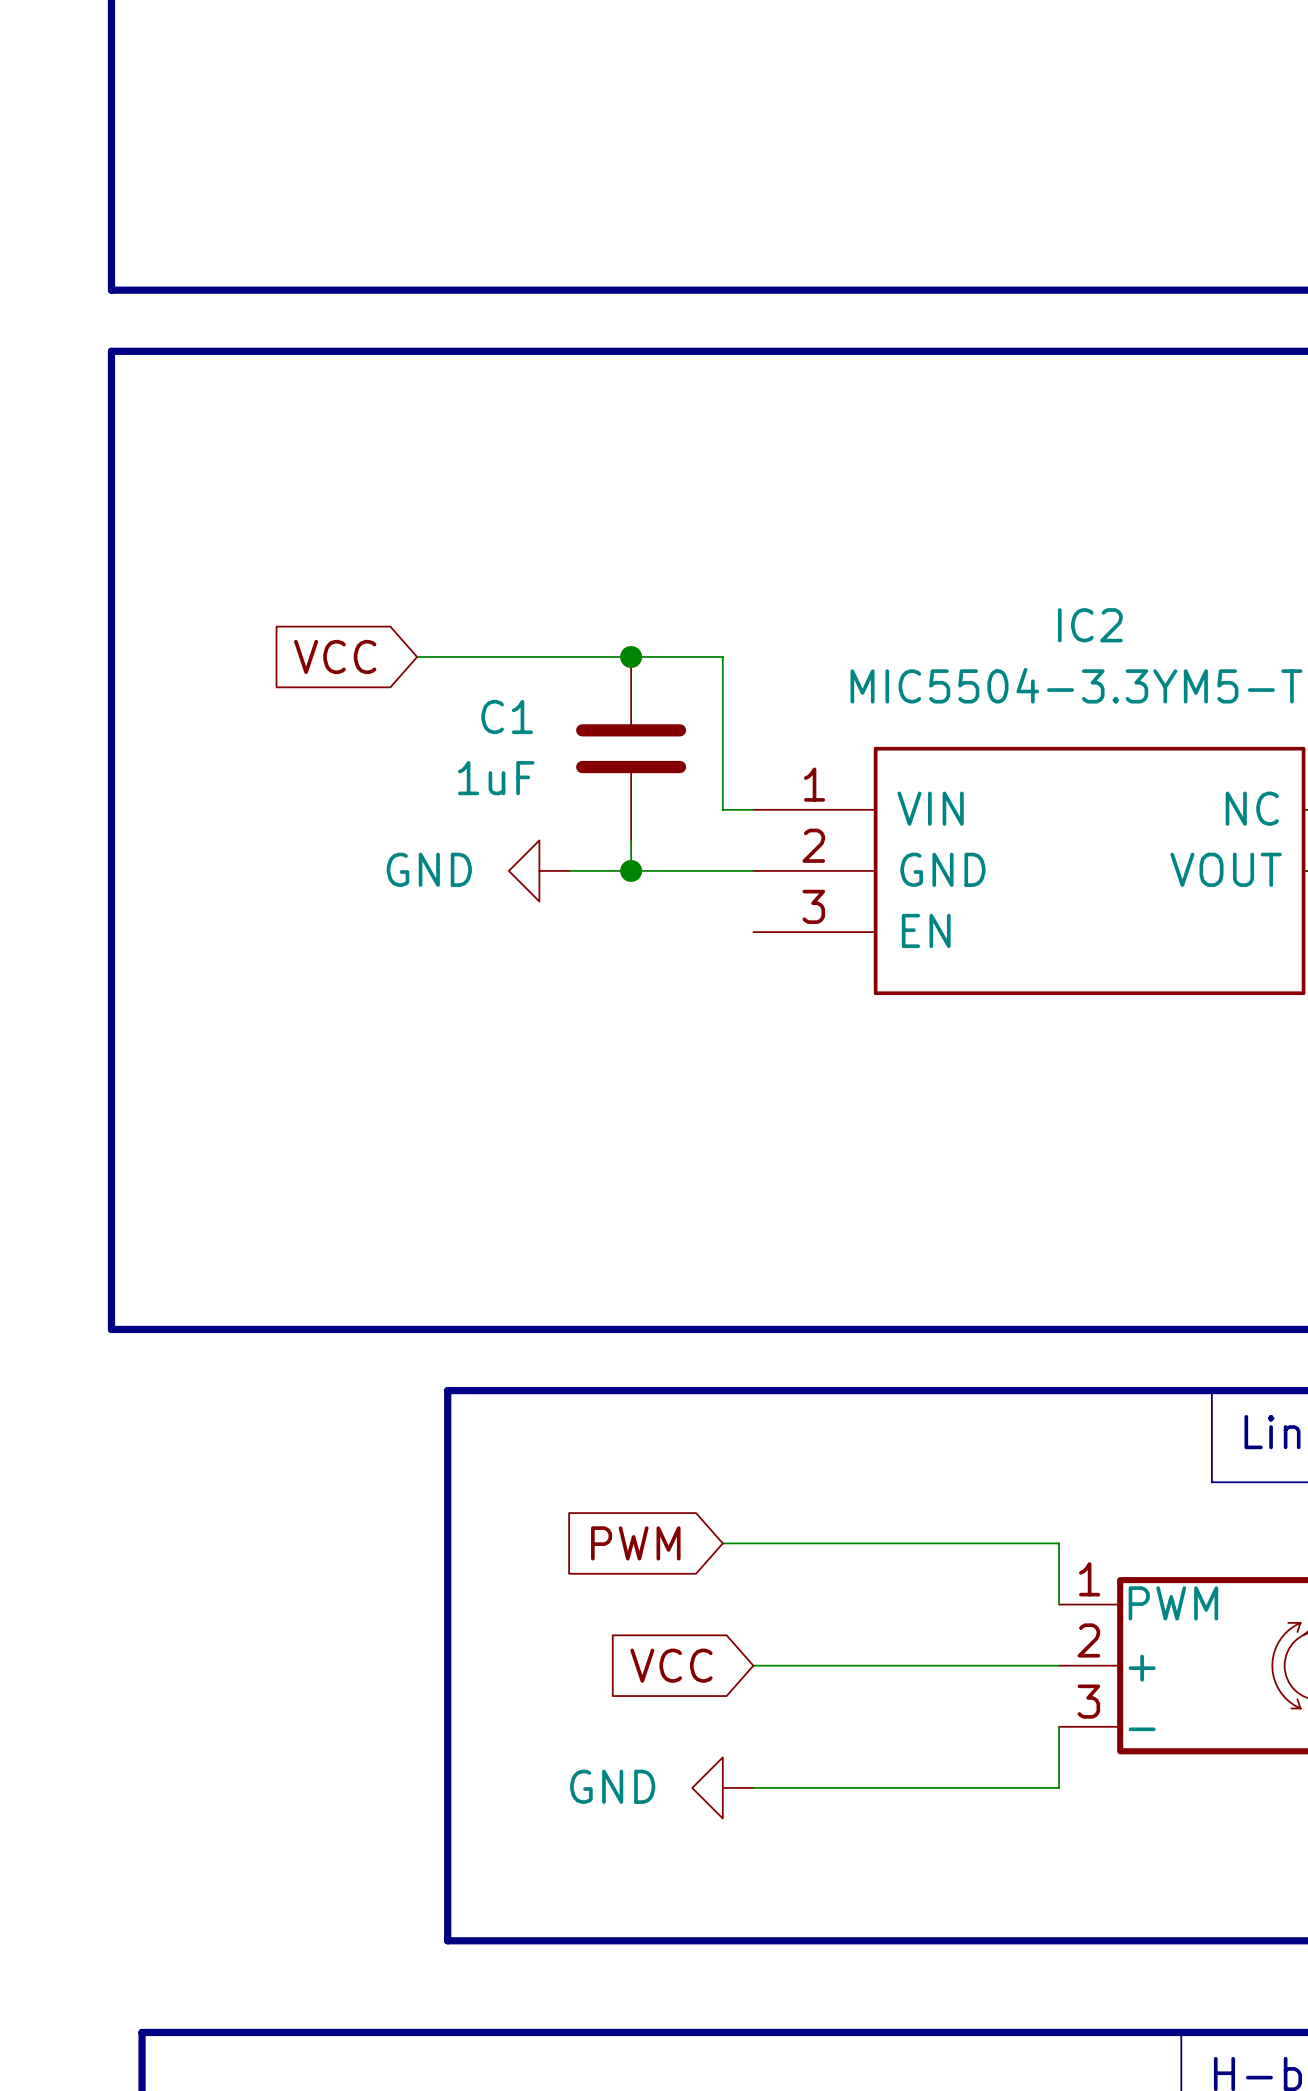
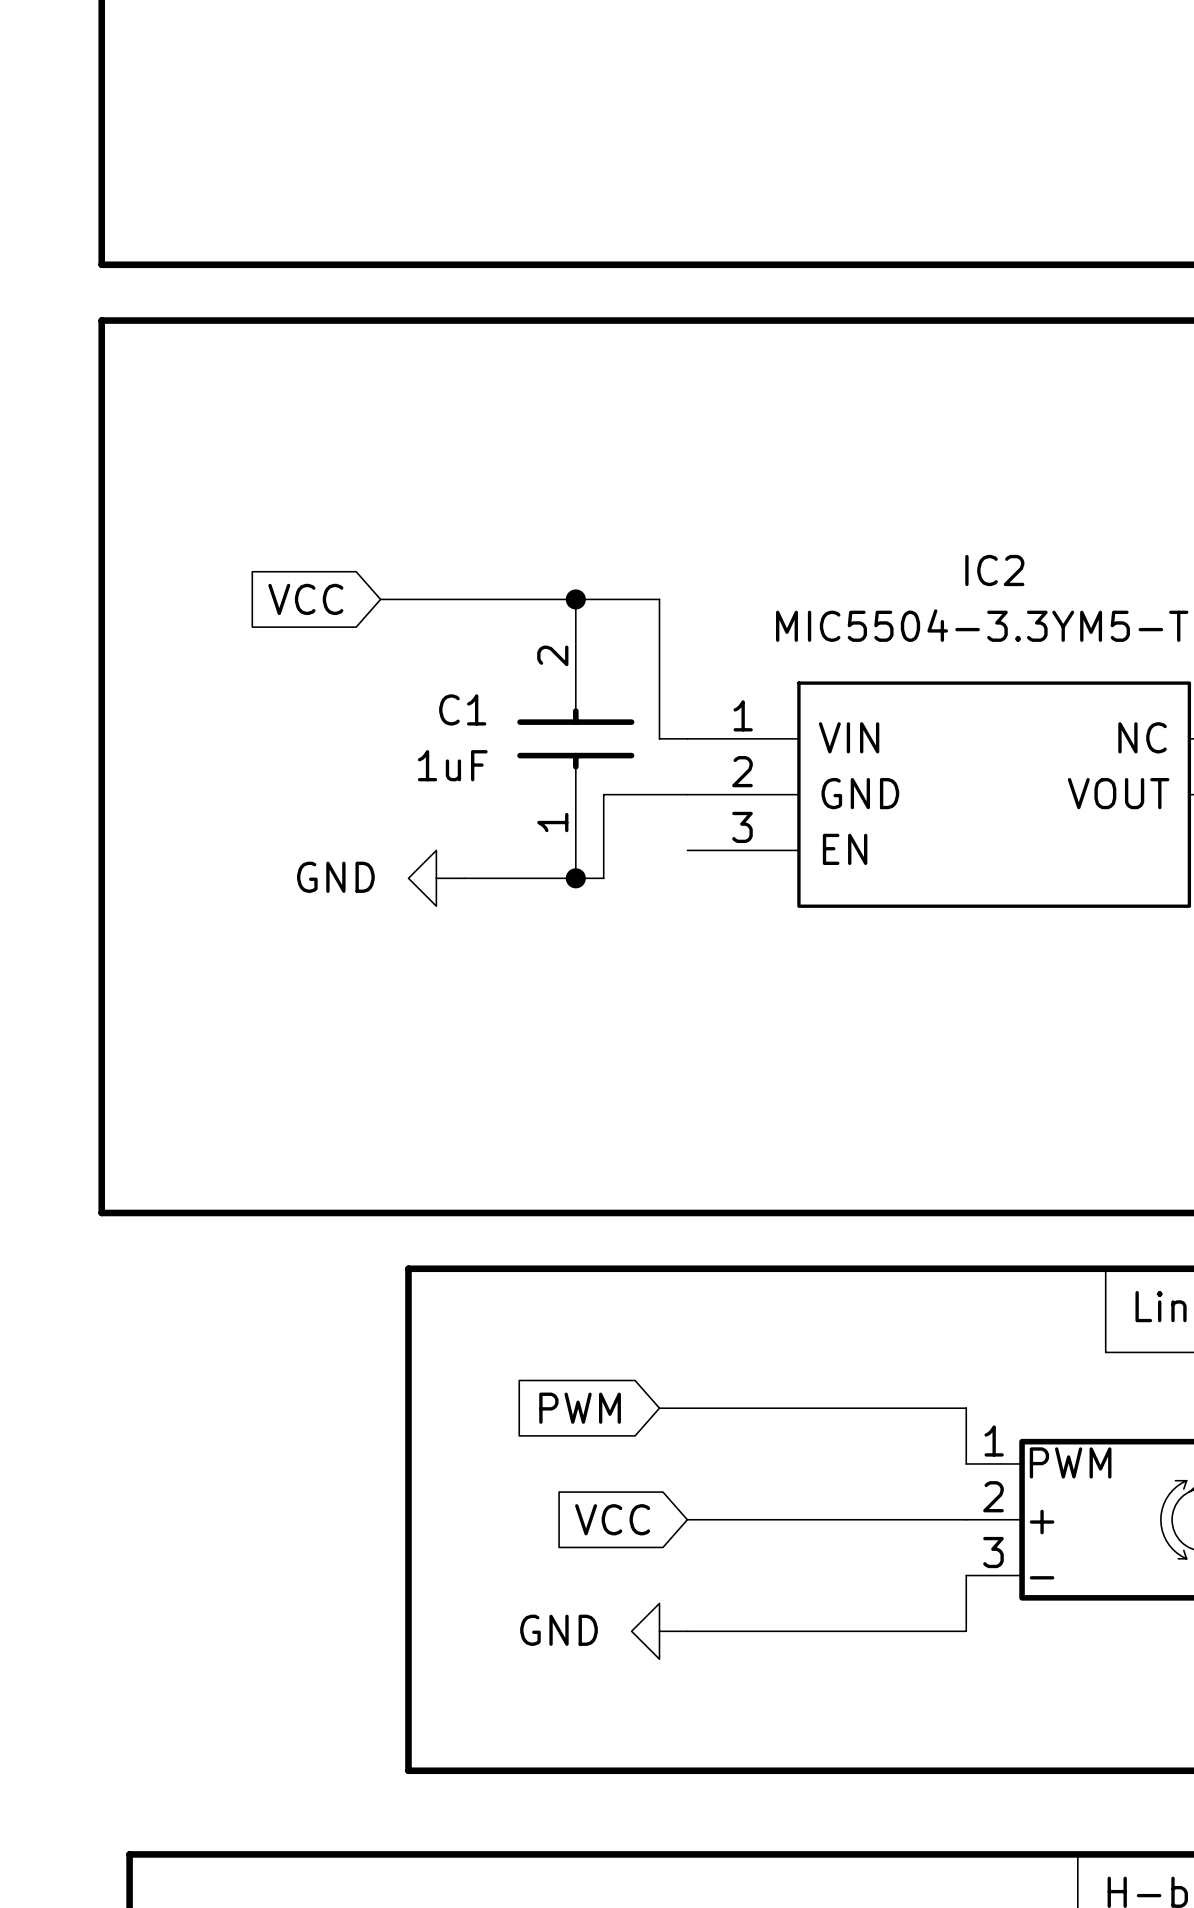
C1 symbol: [576, 656, 687, 841] -> [517, 599, 635, 879]
power symbol position: GND (539, 870) -> GND (436, 878)
wire: (569, 870) (661, 870) -> (464, 878) (603, 878) (603, 794)
junction position: (631, 870) -> (575, 878)

